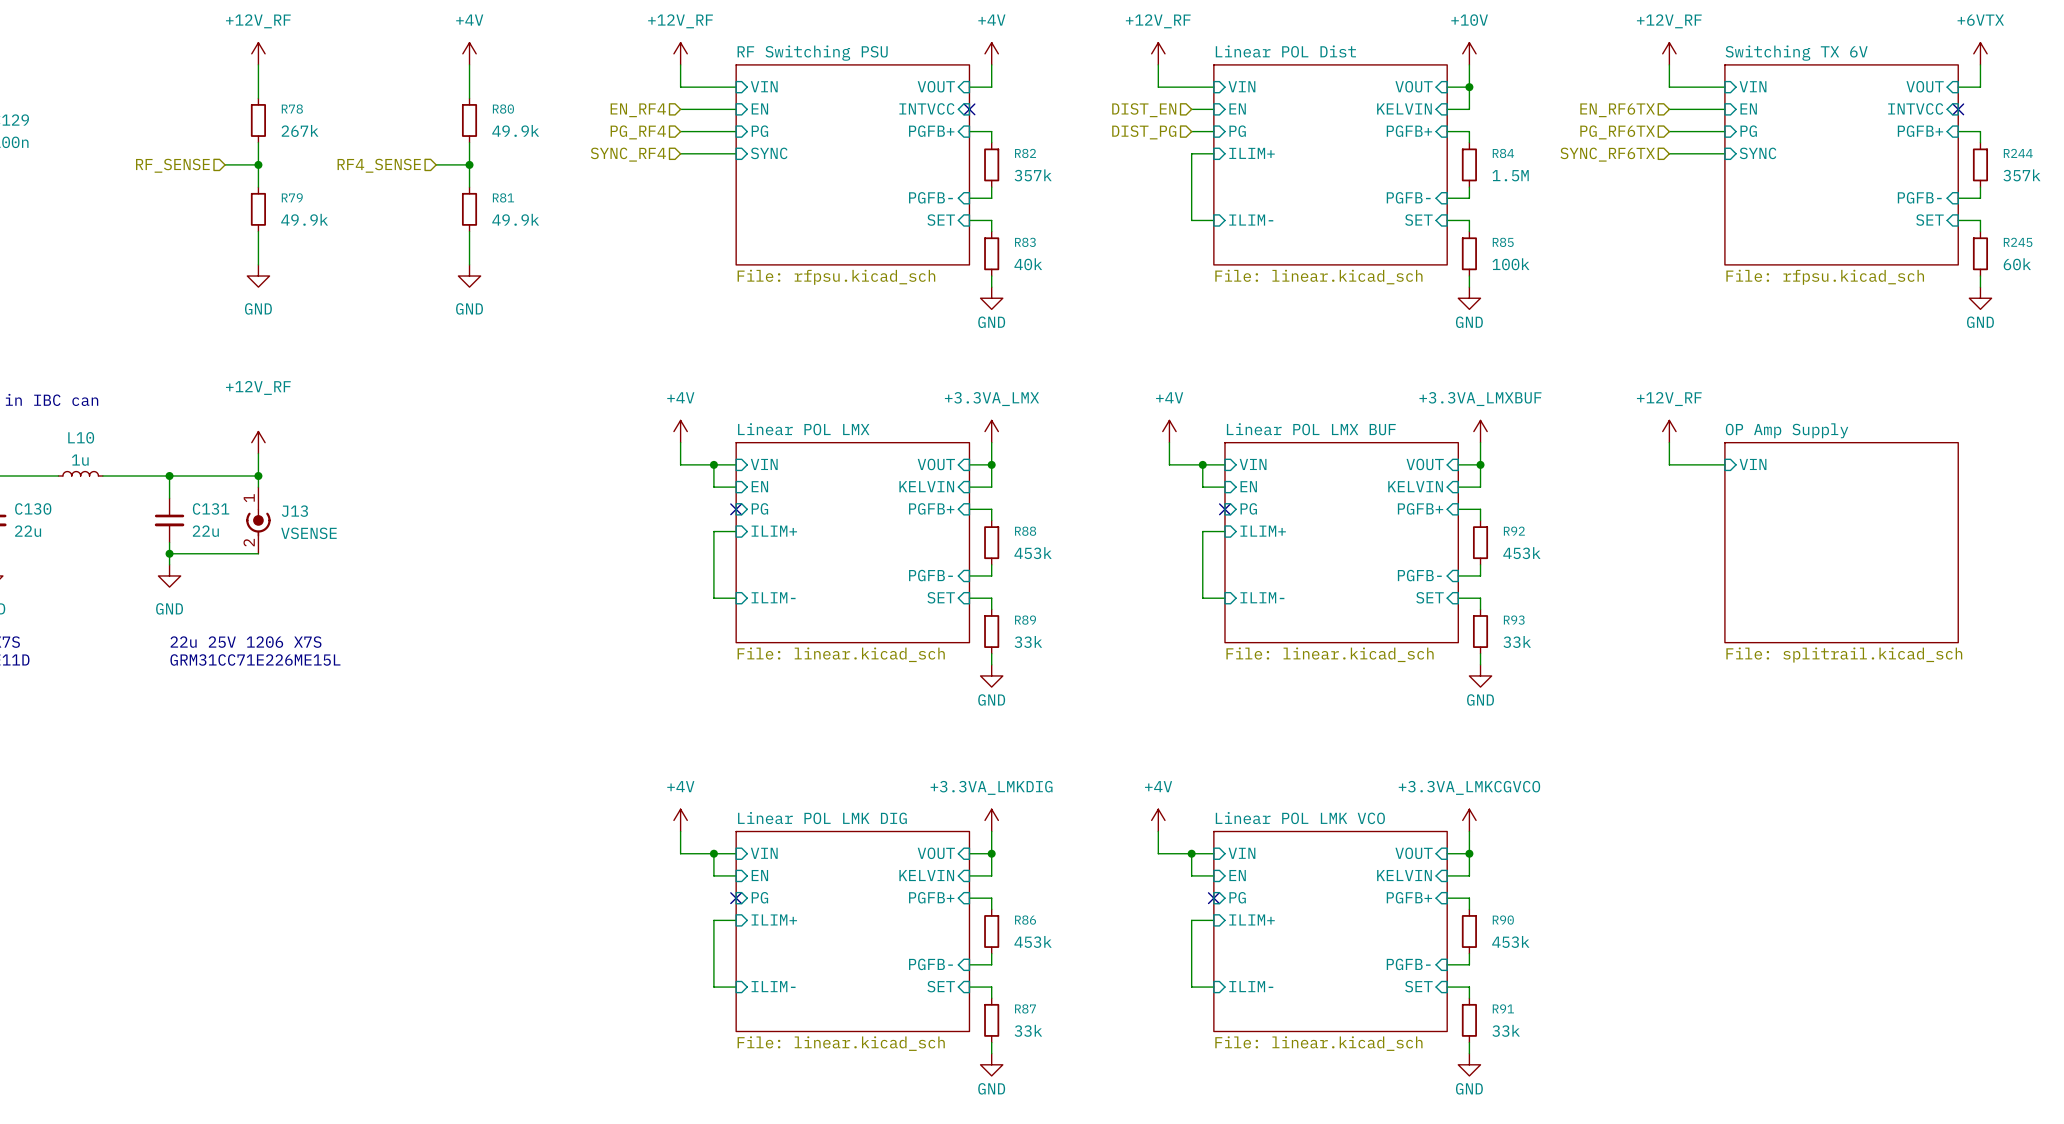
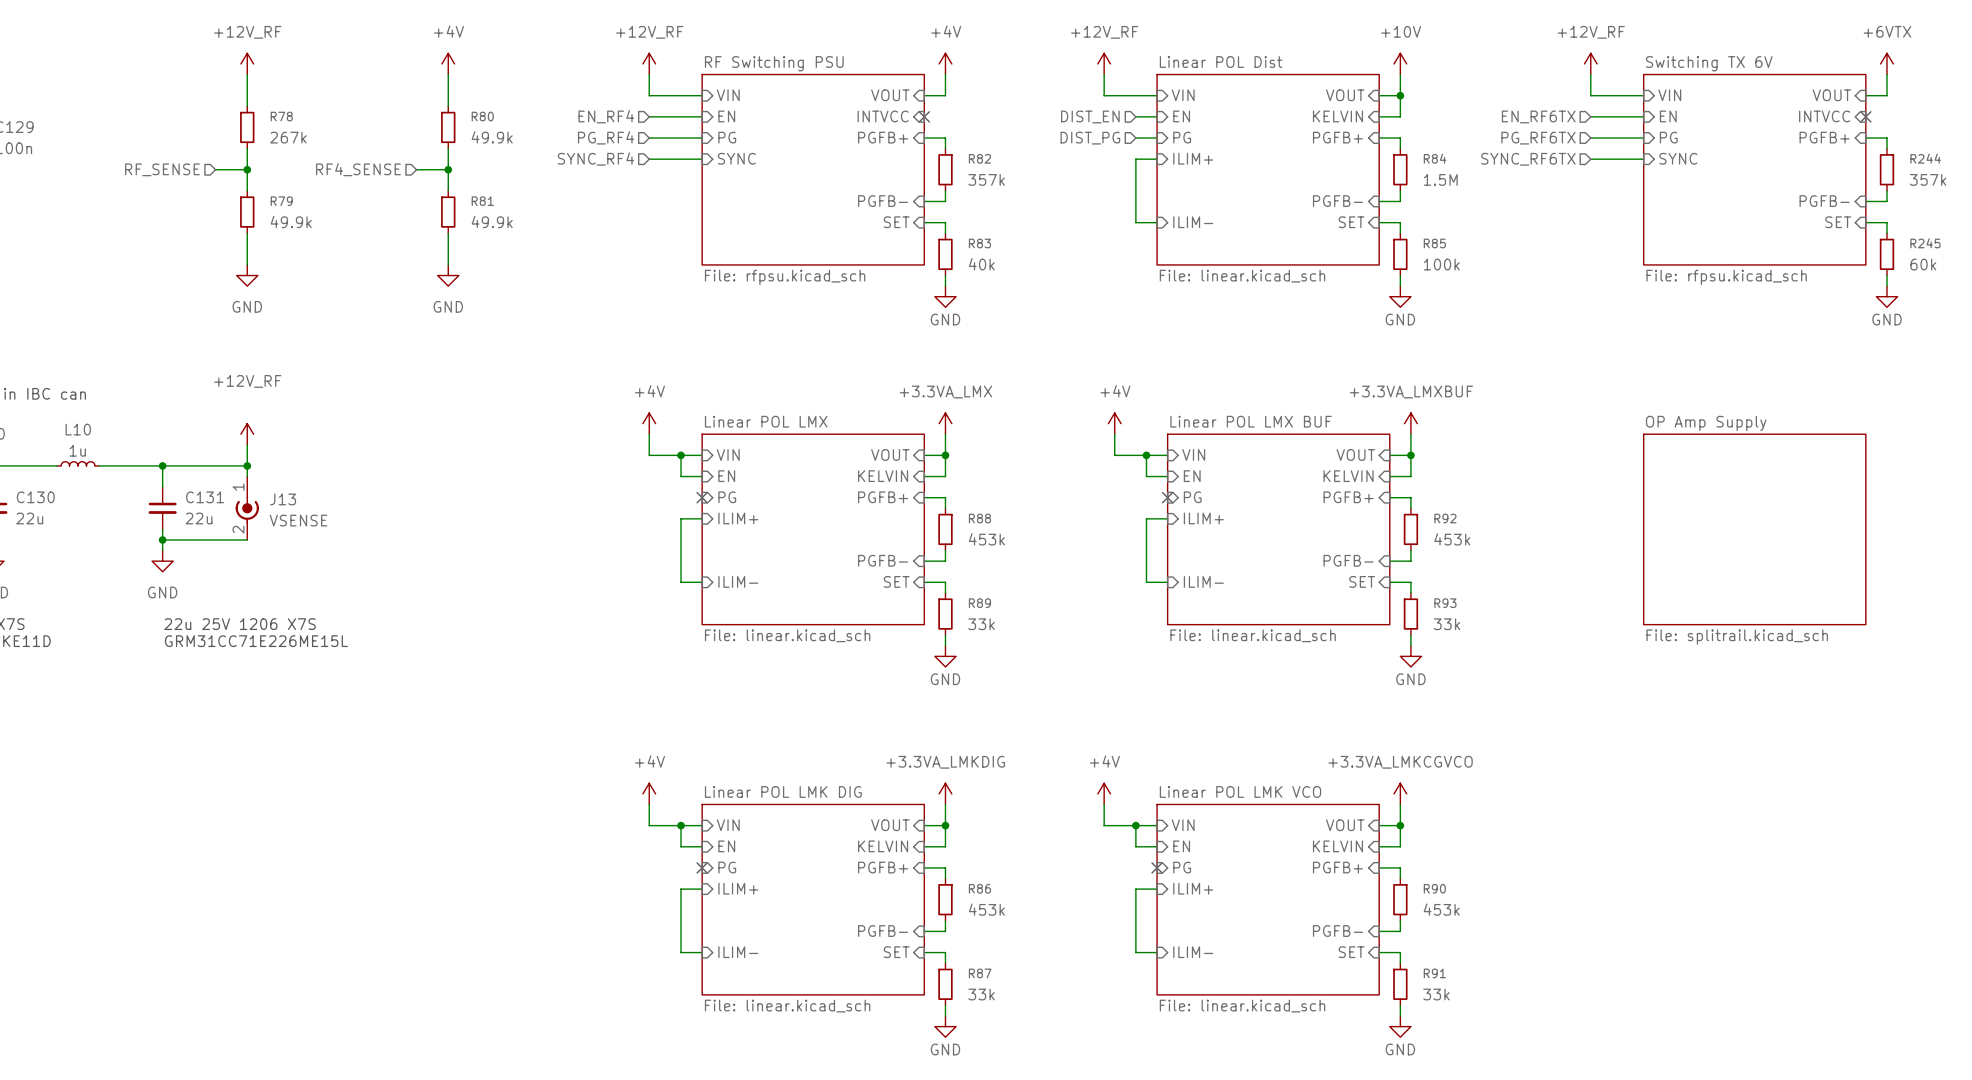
power symbol: +12V_RF (1669, 431) -> none
wire: (1669, 442) (1669, 464) (1724, 464) -> none
sheet pin: VIN (1753, 464) -> none

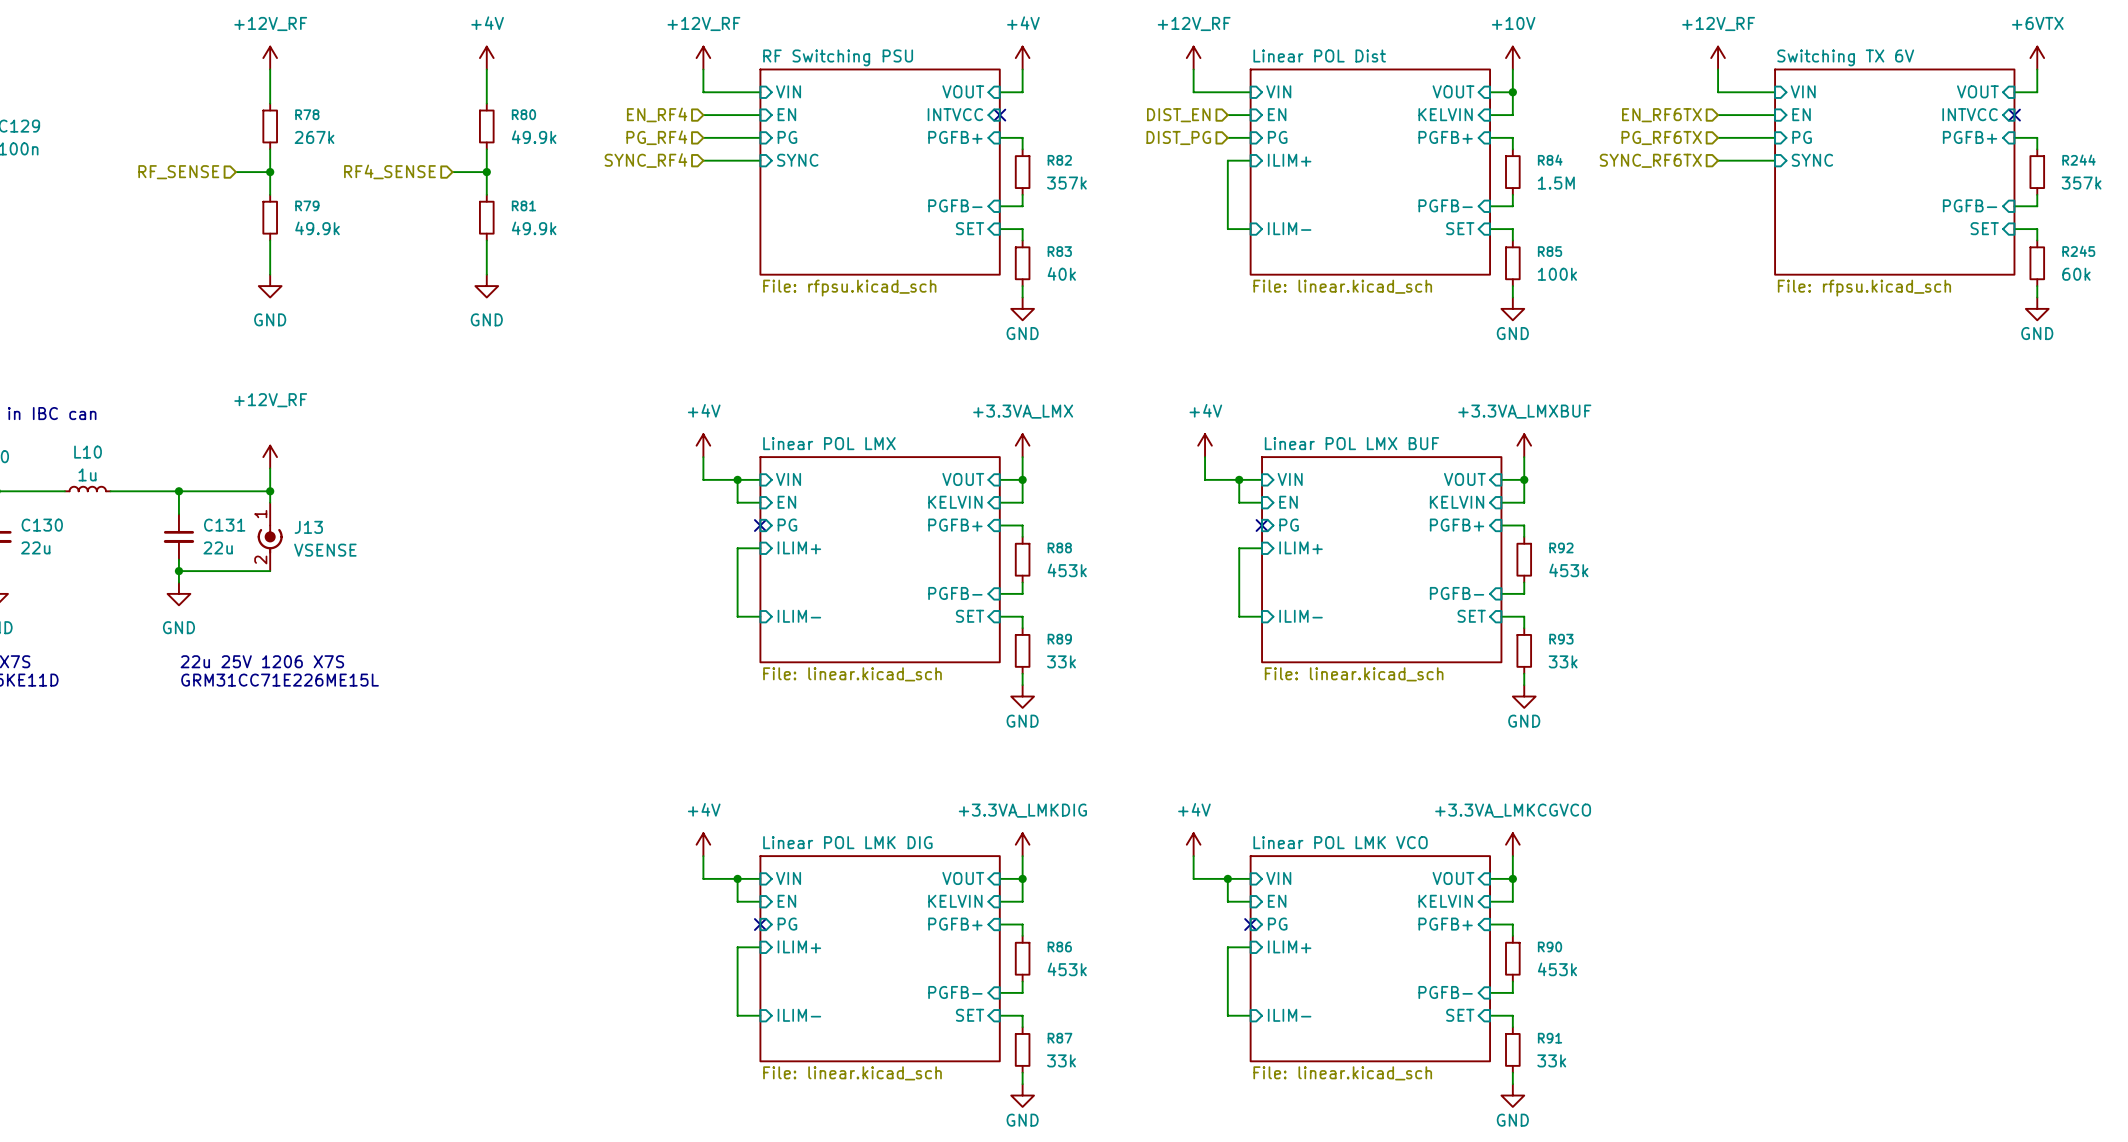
sheet OP Amp Supply: File: splitrail.kicad_sch (1754, 529) -> none

